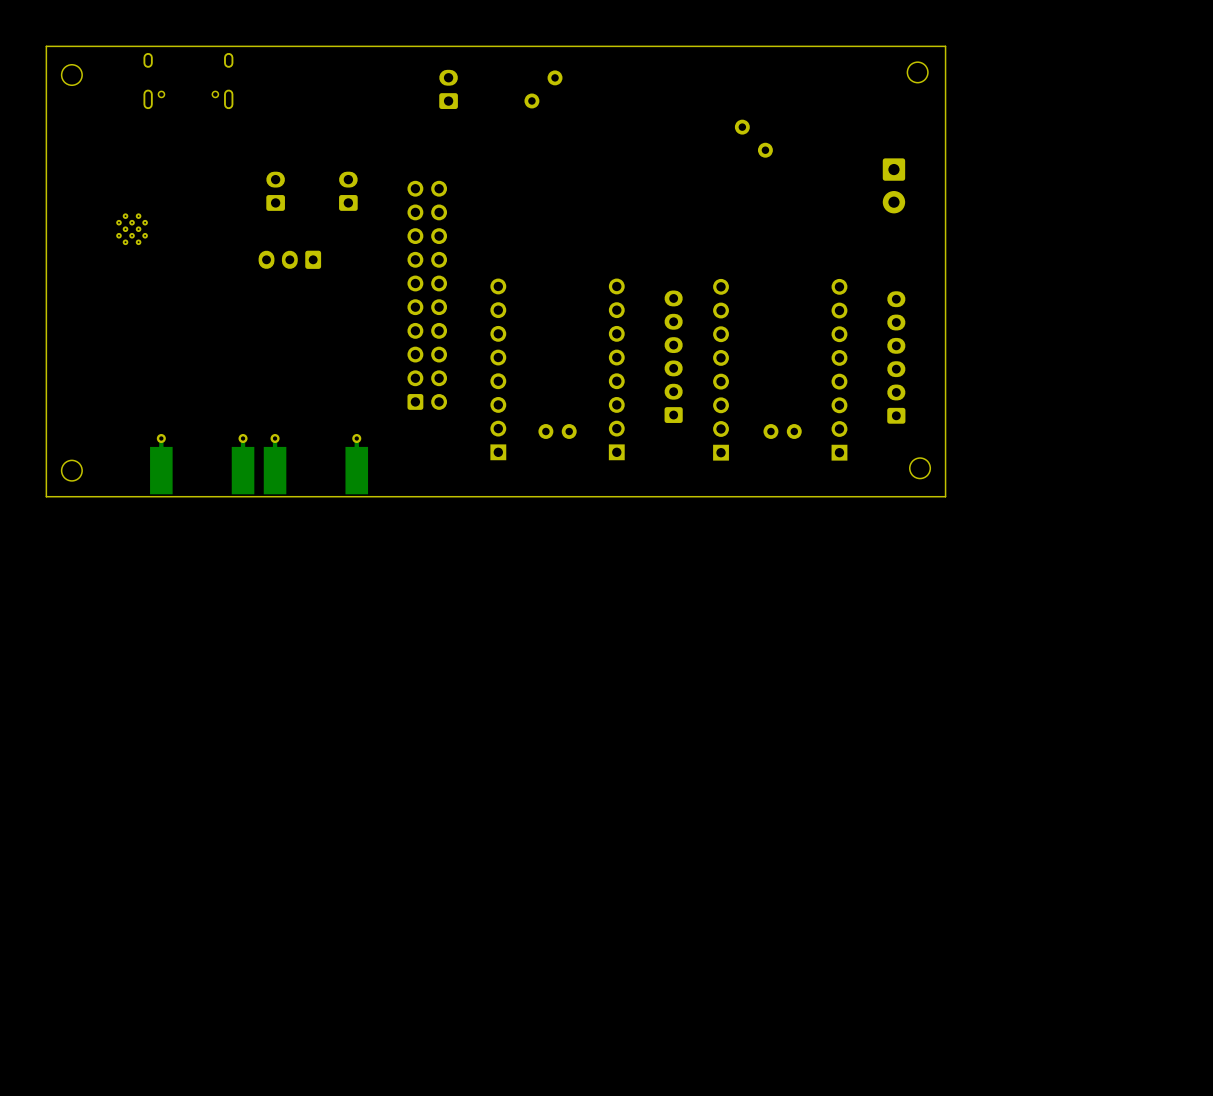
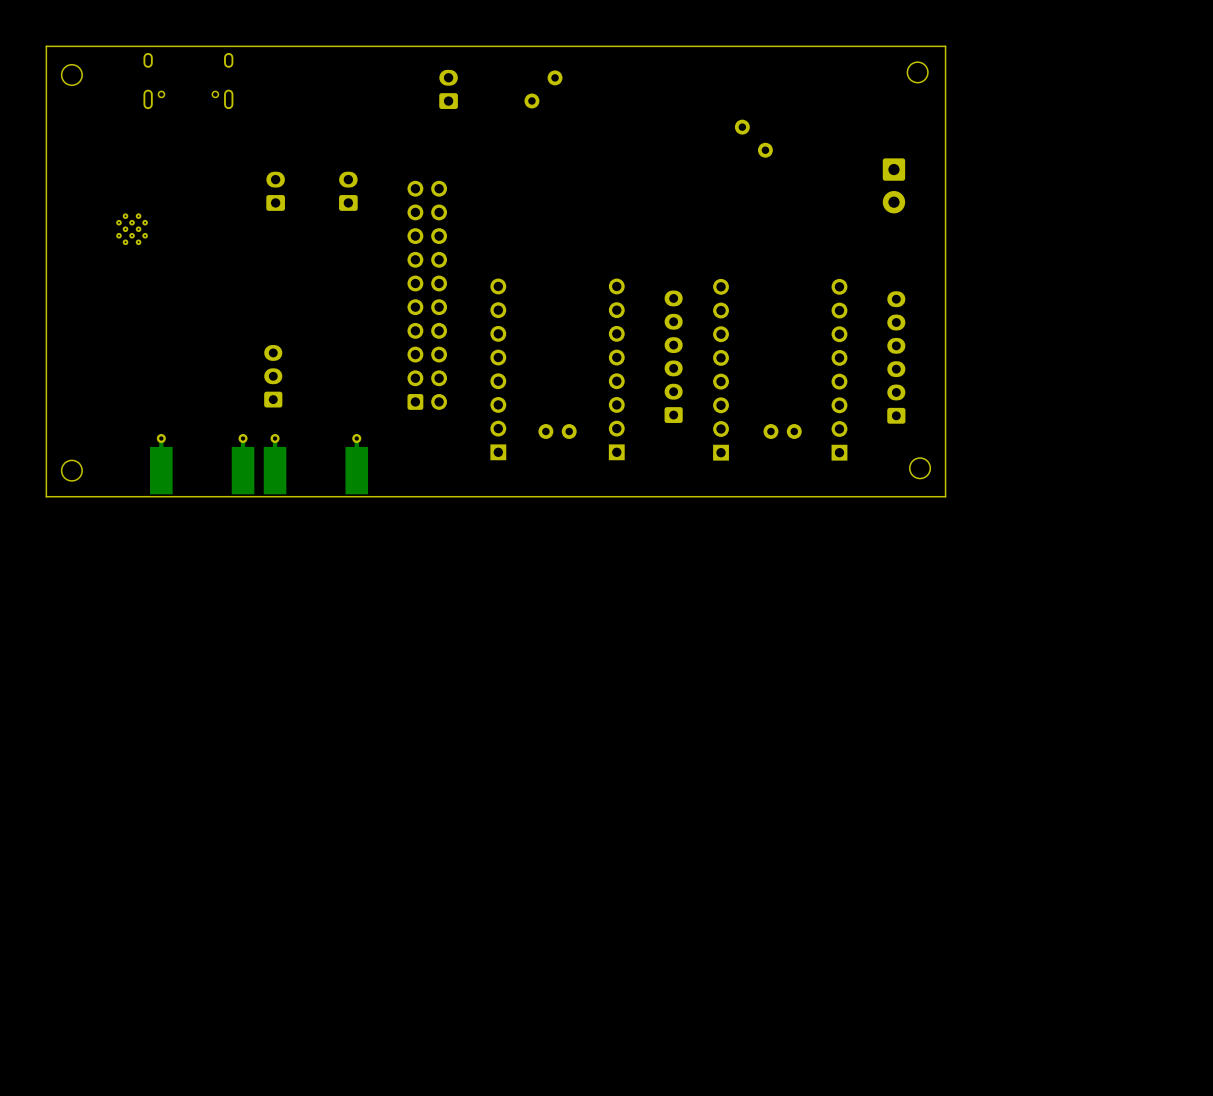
part rotation: 0° (289, 259) -> 90° clockwise (273, 376)
part position: (289, 259) -> (273, 376)

